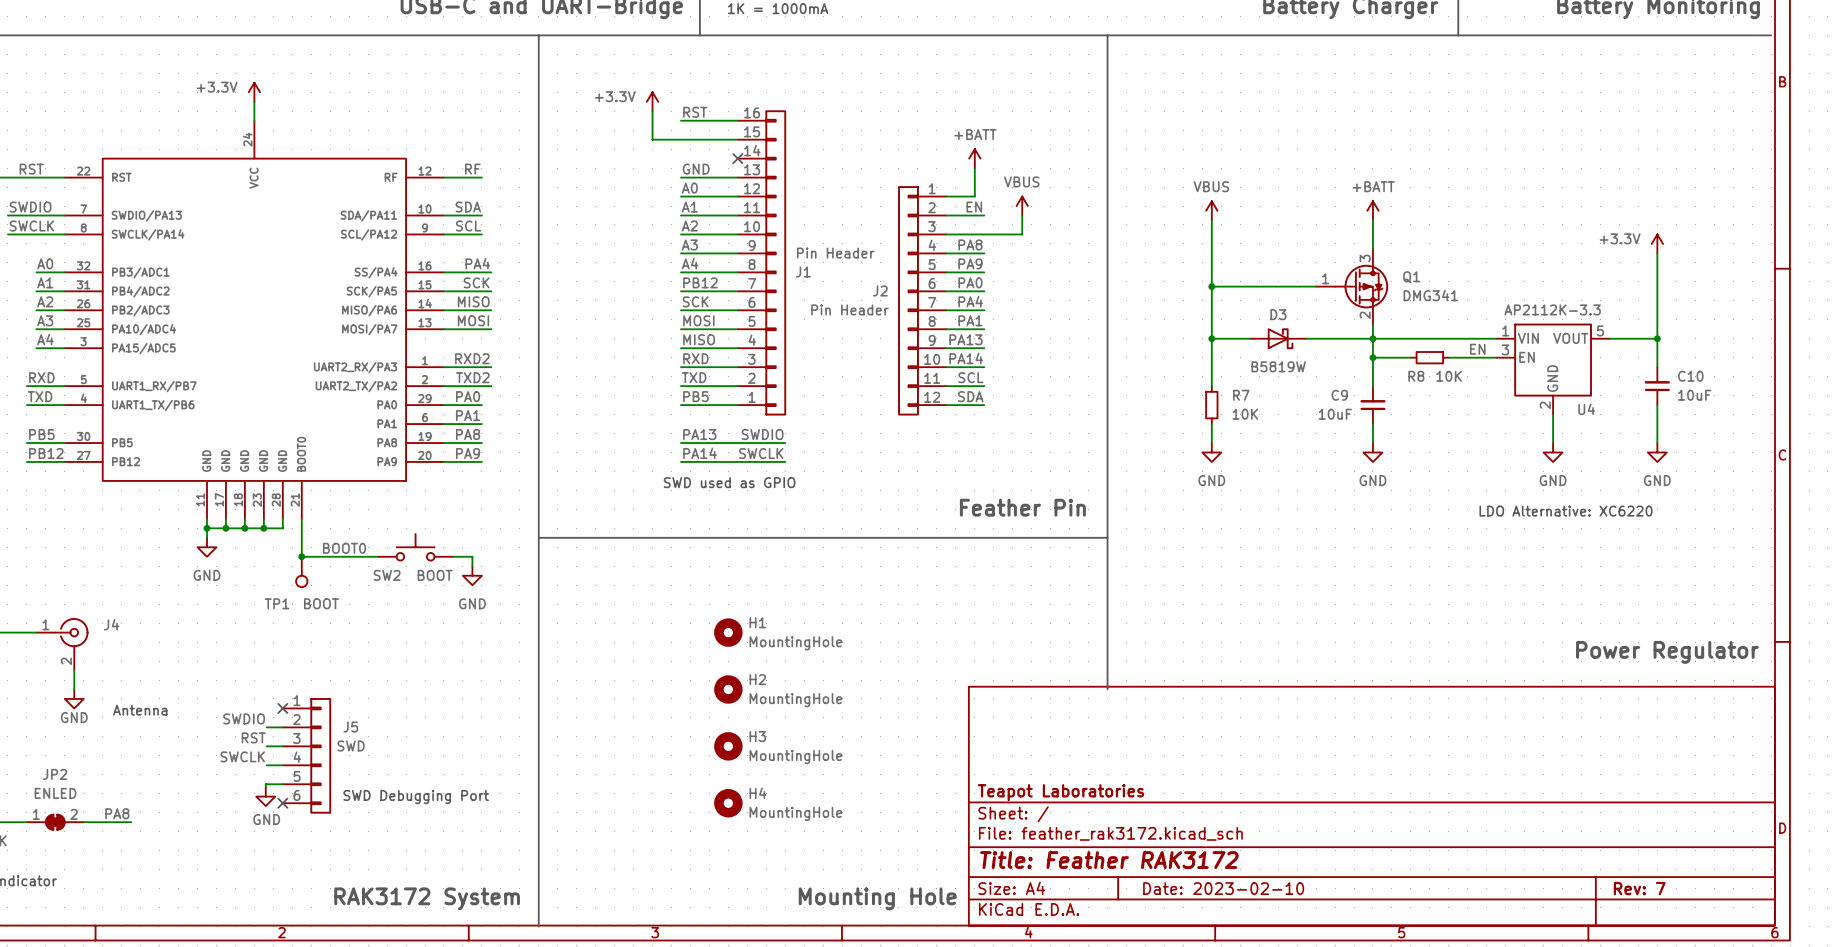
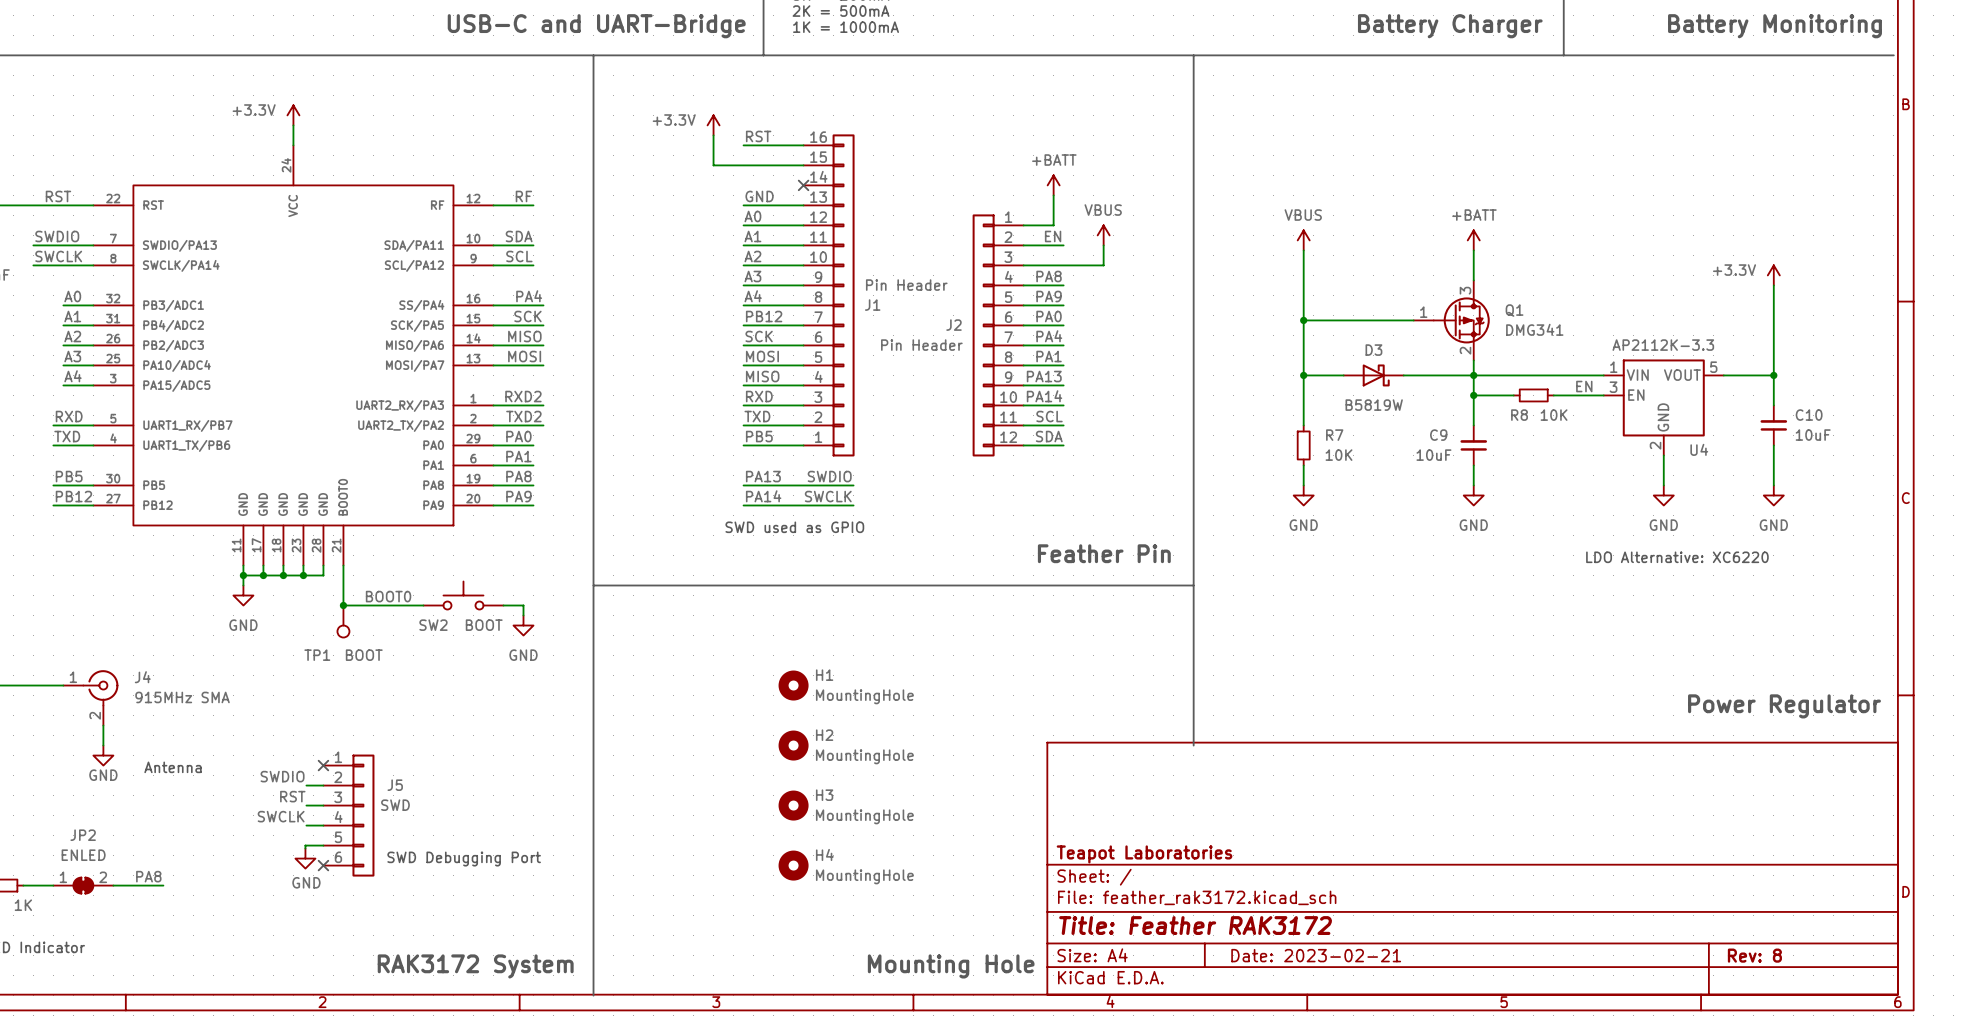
J4 value: none -> 915MHz SMA (182, 697)
title block: Date: 2023-02-10 (1223, 888) -> Date: 2023-02-21 (1316, 955)
title block: Rev: 7 (1639, 888) -> Rev: 8 (1754, 955)

